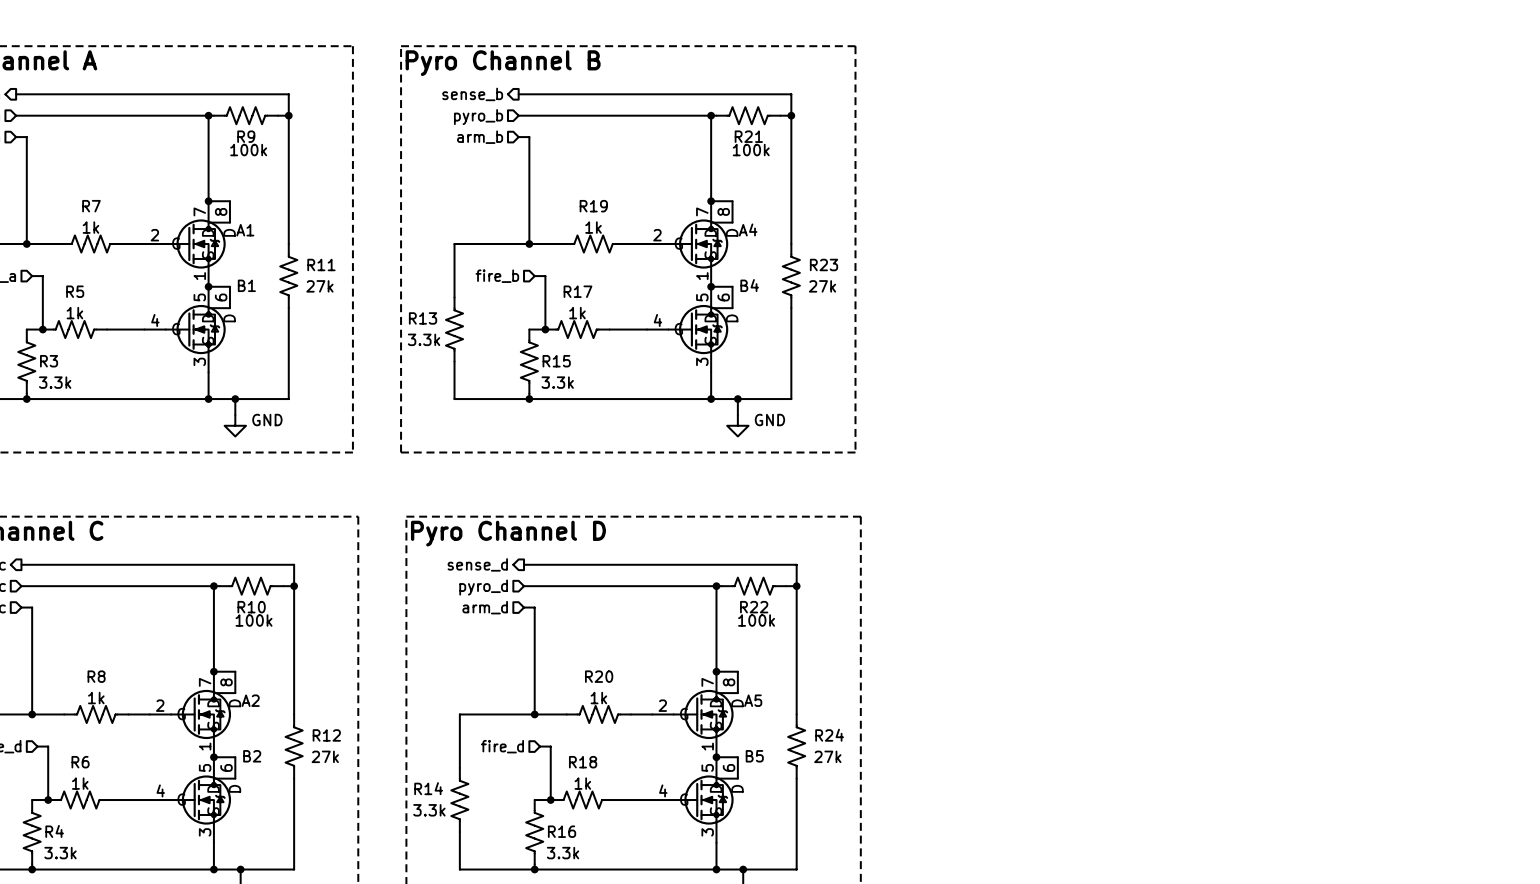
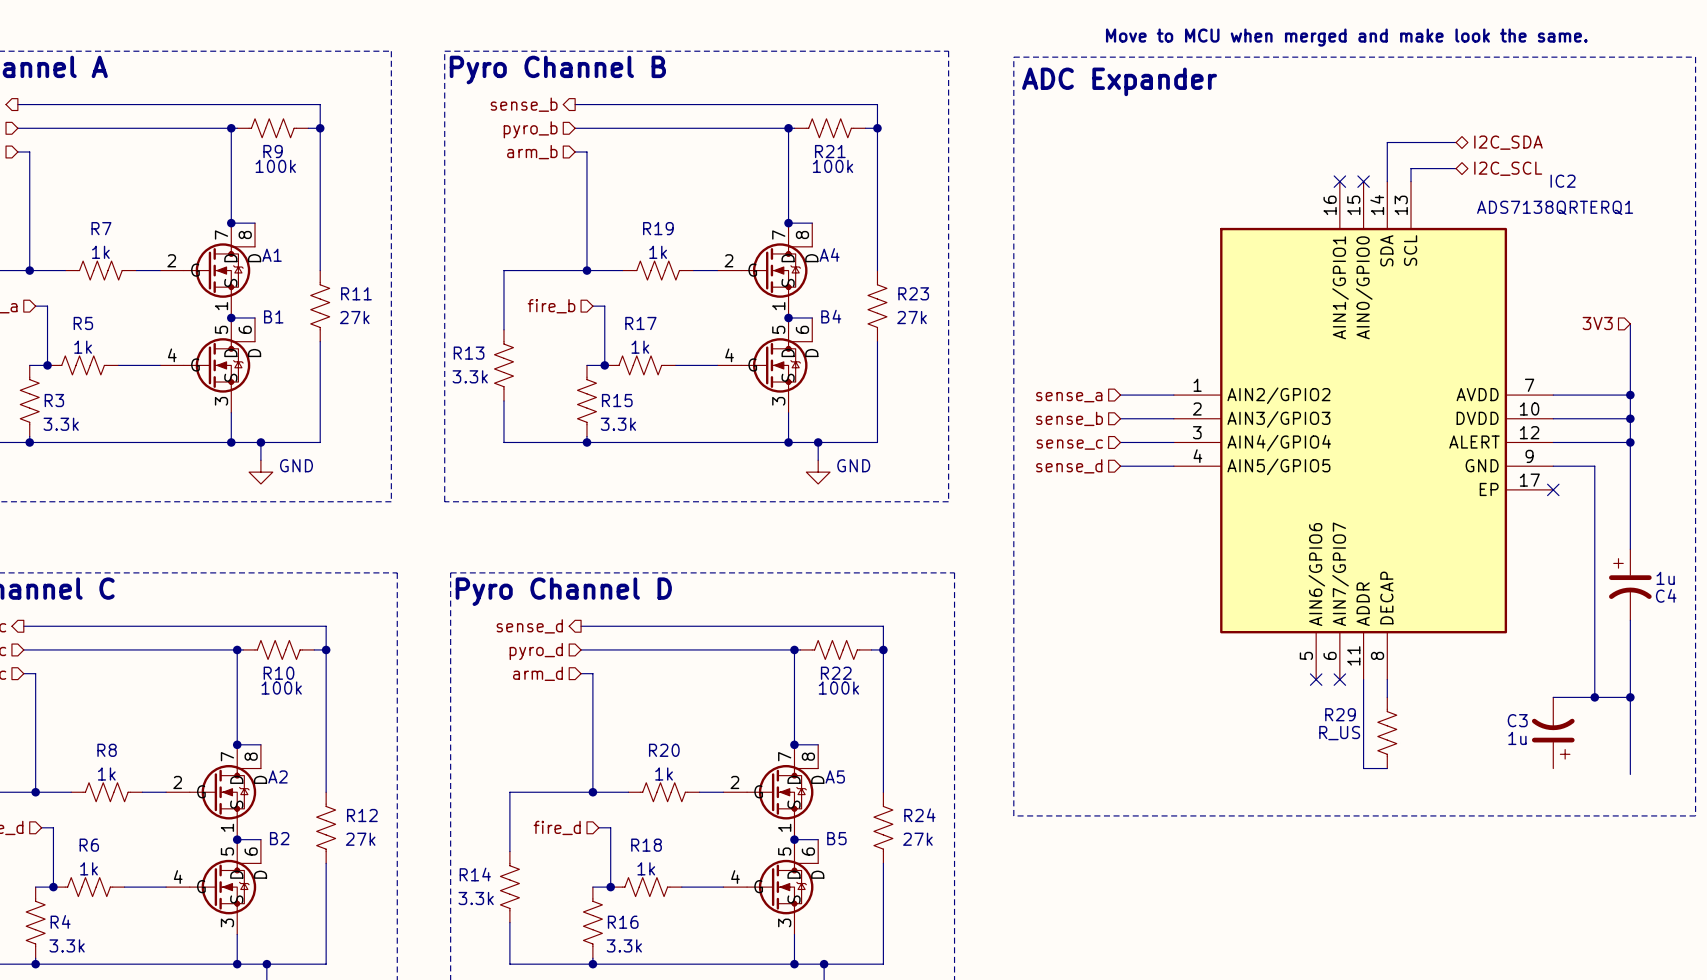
text: none -> Move to MCU when merged and make look the same. (1346, 37)
line: none -> (1013, 57) (1695, 57) (1695, 815) (1013, 815) (1013, 57)
text: none -> ADC Expander (1119, 81)
wire: none -> (1456, 142) (1387, 142) (1387, 181)
hierarchical label: none -> I2C_SDA (1508, 142)
wire: none -> (1456, 168) (1411, 168) (1411, 181)
hierarchical label: none -> I2C_SCL (1508, 168)
no-connect mark: none -> (1339, 181)
no-connect mark: none -> (1363, 181)
hierarchical label: none -> 3V3 (1597, 323)
wire: none -> (1630, 323) (1630, 549)
wire: none -> (1120, 395) (1173, 395)
wire: none -> (1553, 395) (1630, 395)
junction: none -> (1630, 395)
hierarchical label: none -> sense_a (1069, 397)
hierarchical label: none -> sense_b (1069, 418)
wire: none -> (1120, 418) (1173, 418)
wire: none -> (1553, 418) (1630, 418)
junction: none -> (1630, 418)
IC2: none -> ADS7138QRTERQ1 (1363, 430)
wire: none -> (1120, 442) (1173, 442)
wire: none -> (1553, 442) (1630, 442)
junction: none -> (1630, 442)
hierarchical label: none -> sense_c (1069, 444)
hierarchical label: none -> sense_d (1069, 466)
wire: none -> (1120, 466) (1173, 466)
wire: none -> (1553, 466) (1594, 466) (1594, 697)
no-connect mark: none -> (1553, 489)
C4: none -> 1u (1630, 584)
wire: none -> (1630, 620) (1630, 774)
no-connect mark: none -> (1316, 679)
no-connect mark: none -> (1339, 679)
wire: none -> (1363, 679) (1363, 768) (1387, 768)
wire: none -> (1387, 679) (1387, 697)
wire: none -> (1553, 697) (1630, 697)
junction: none -> (1594, 697)
junction: none -> (1630, 697)
R29: none -> R_US (1387, 732)
C3: none -> 1u (1553, 732)

